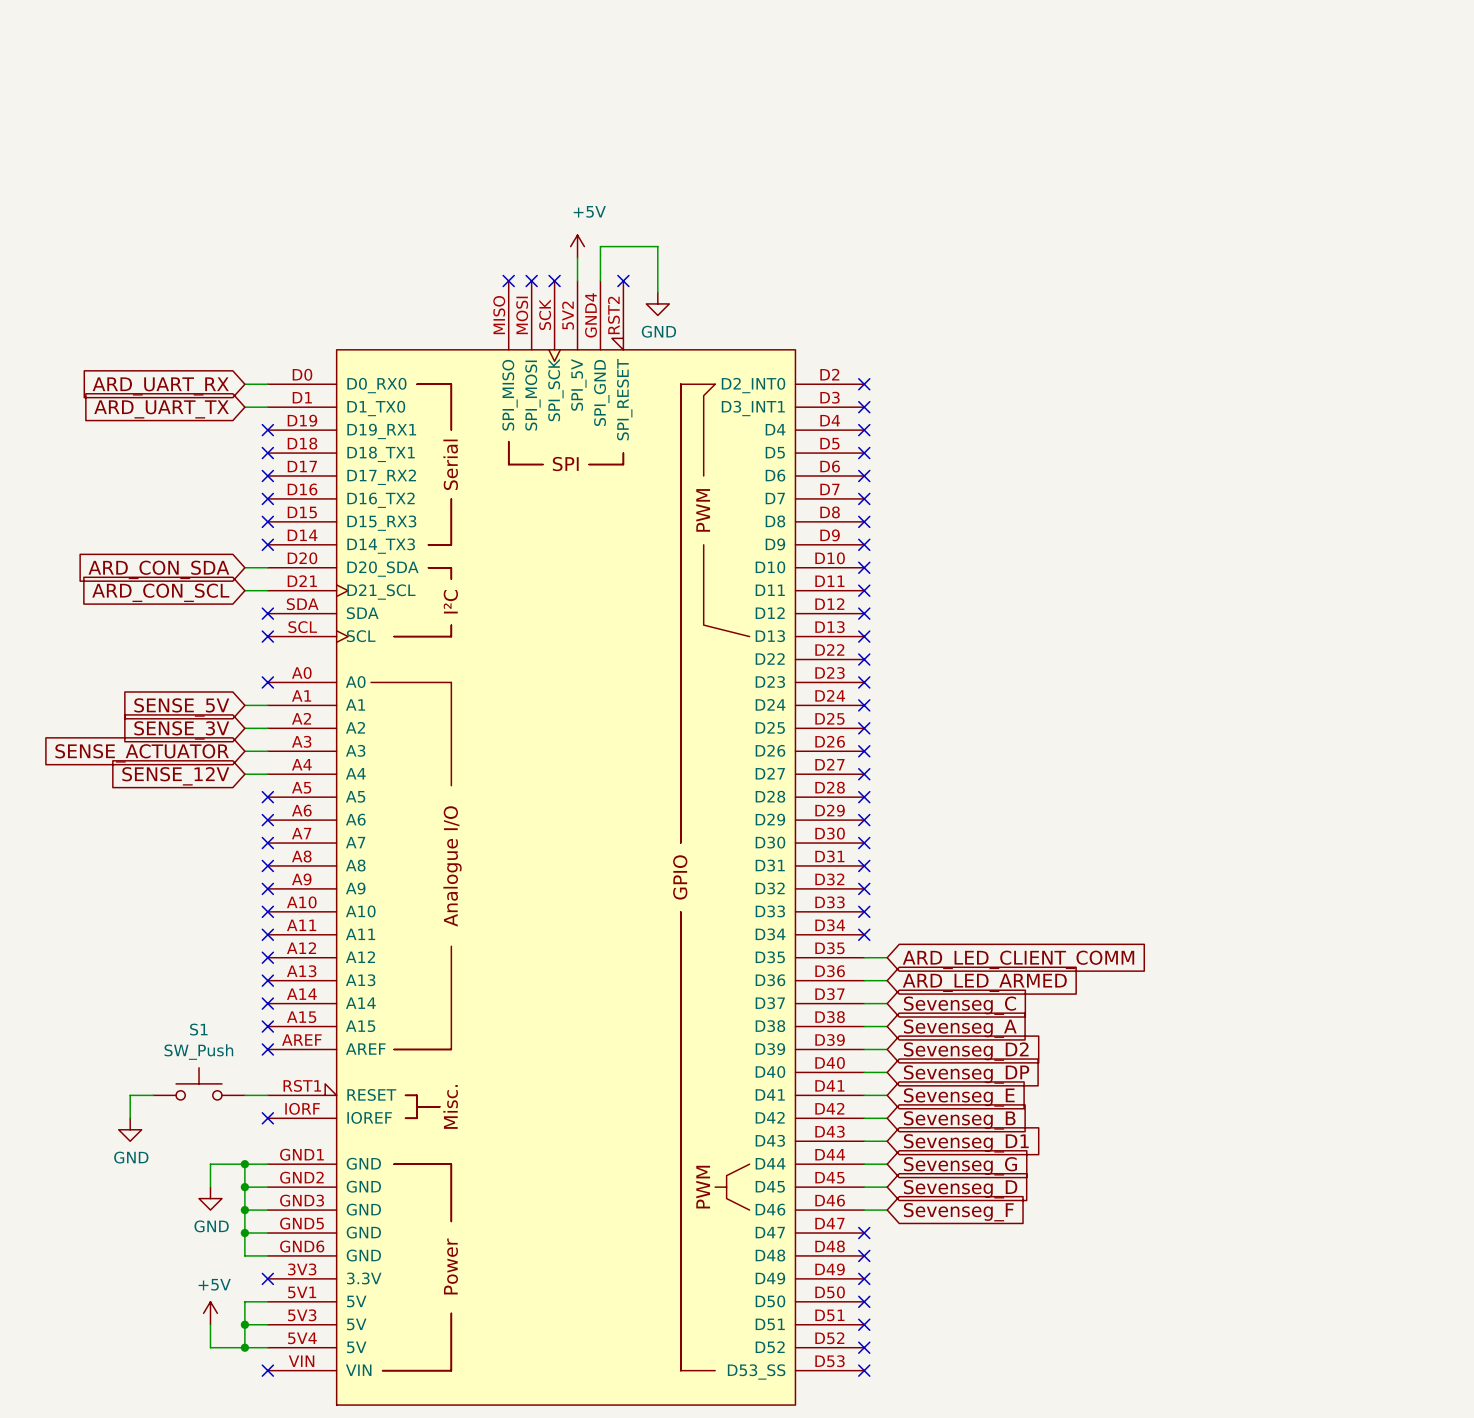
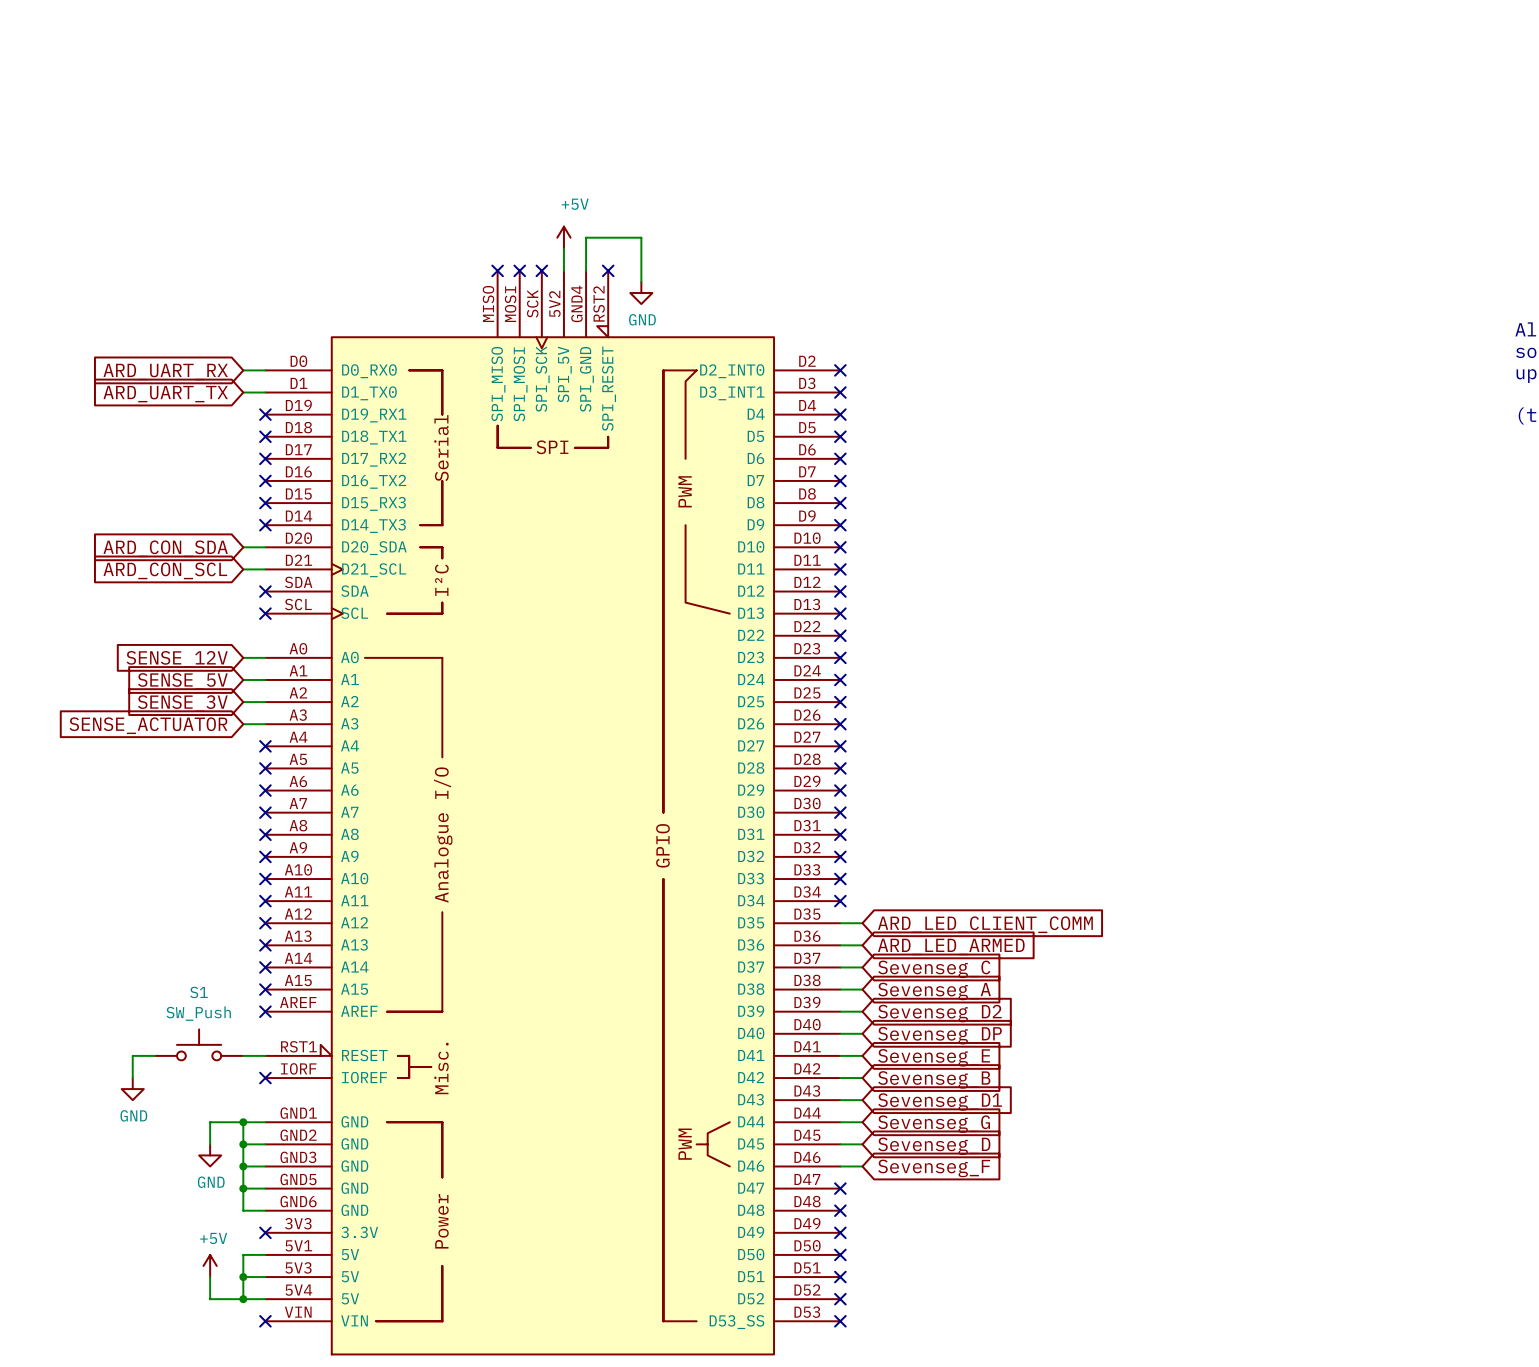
no-connect mark: (267, 682) -> none
wire: (244, 774) (267, 774) -> (243, 657) (265, 657)
no-connect mark: none -> (265, 746)
global label position: SENSE_12V (175, 776) -> SENSE_12V (177, 659)

